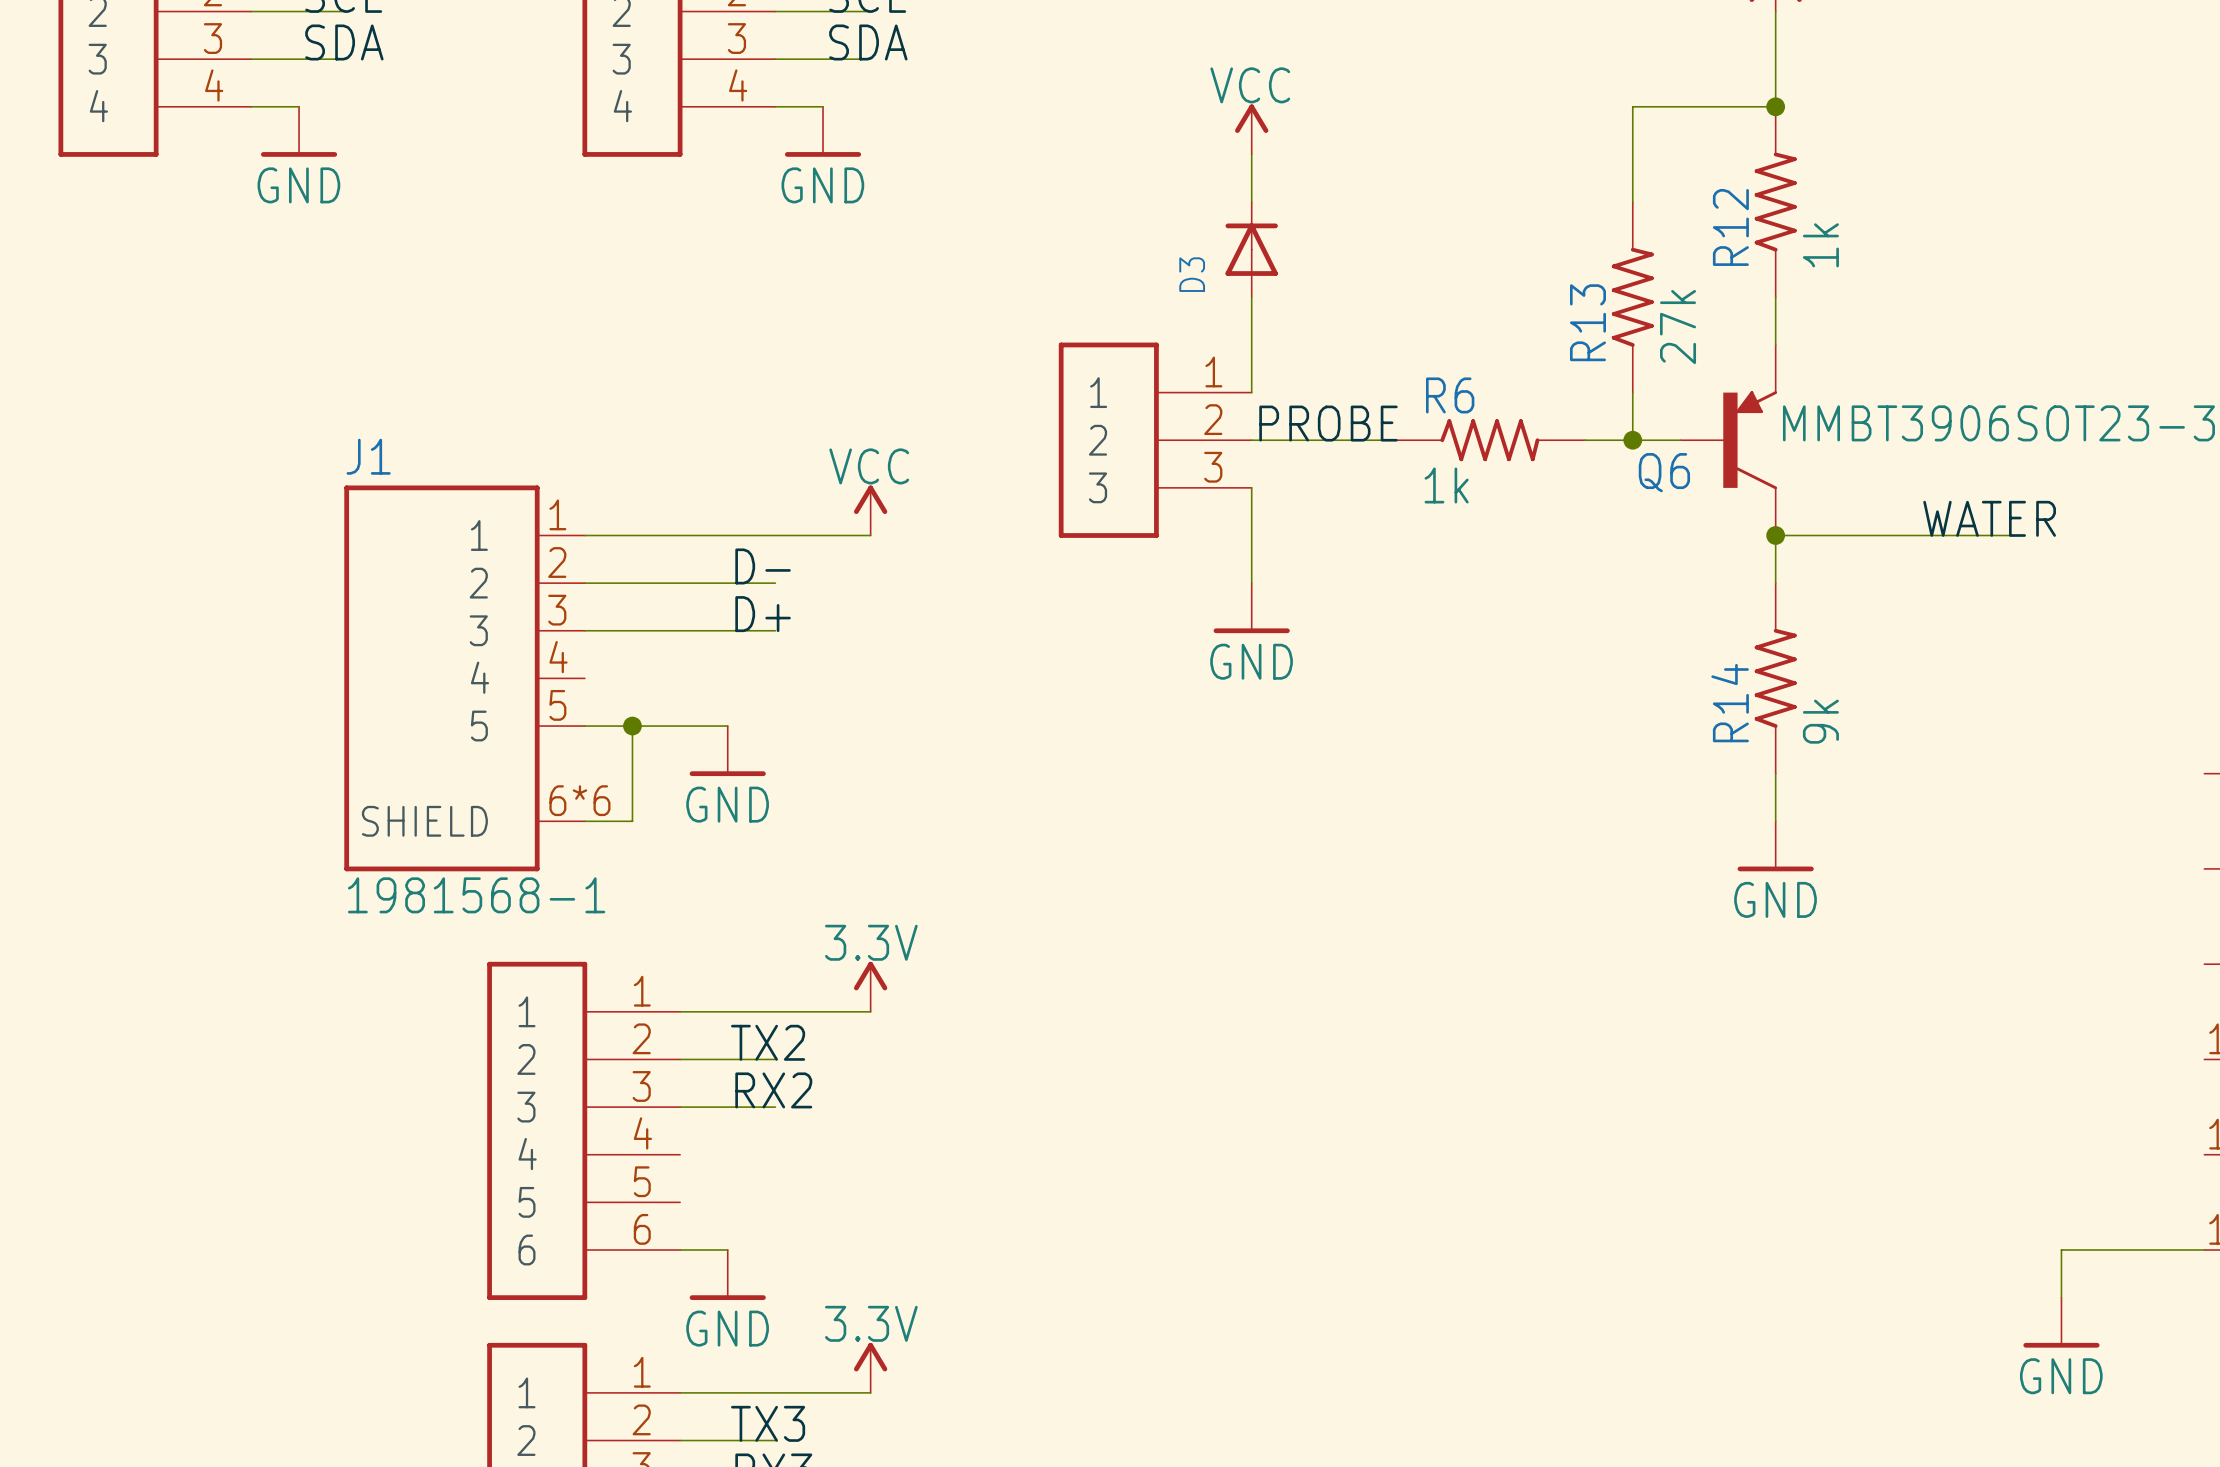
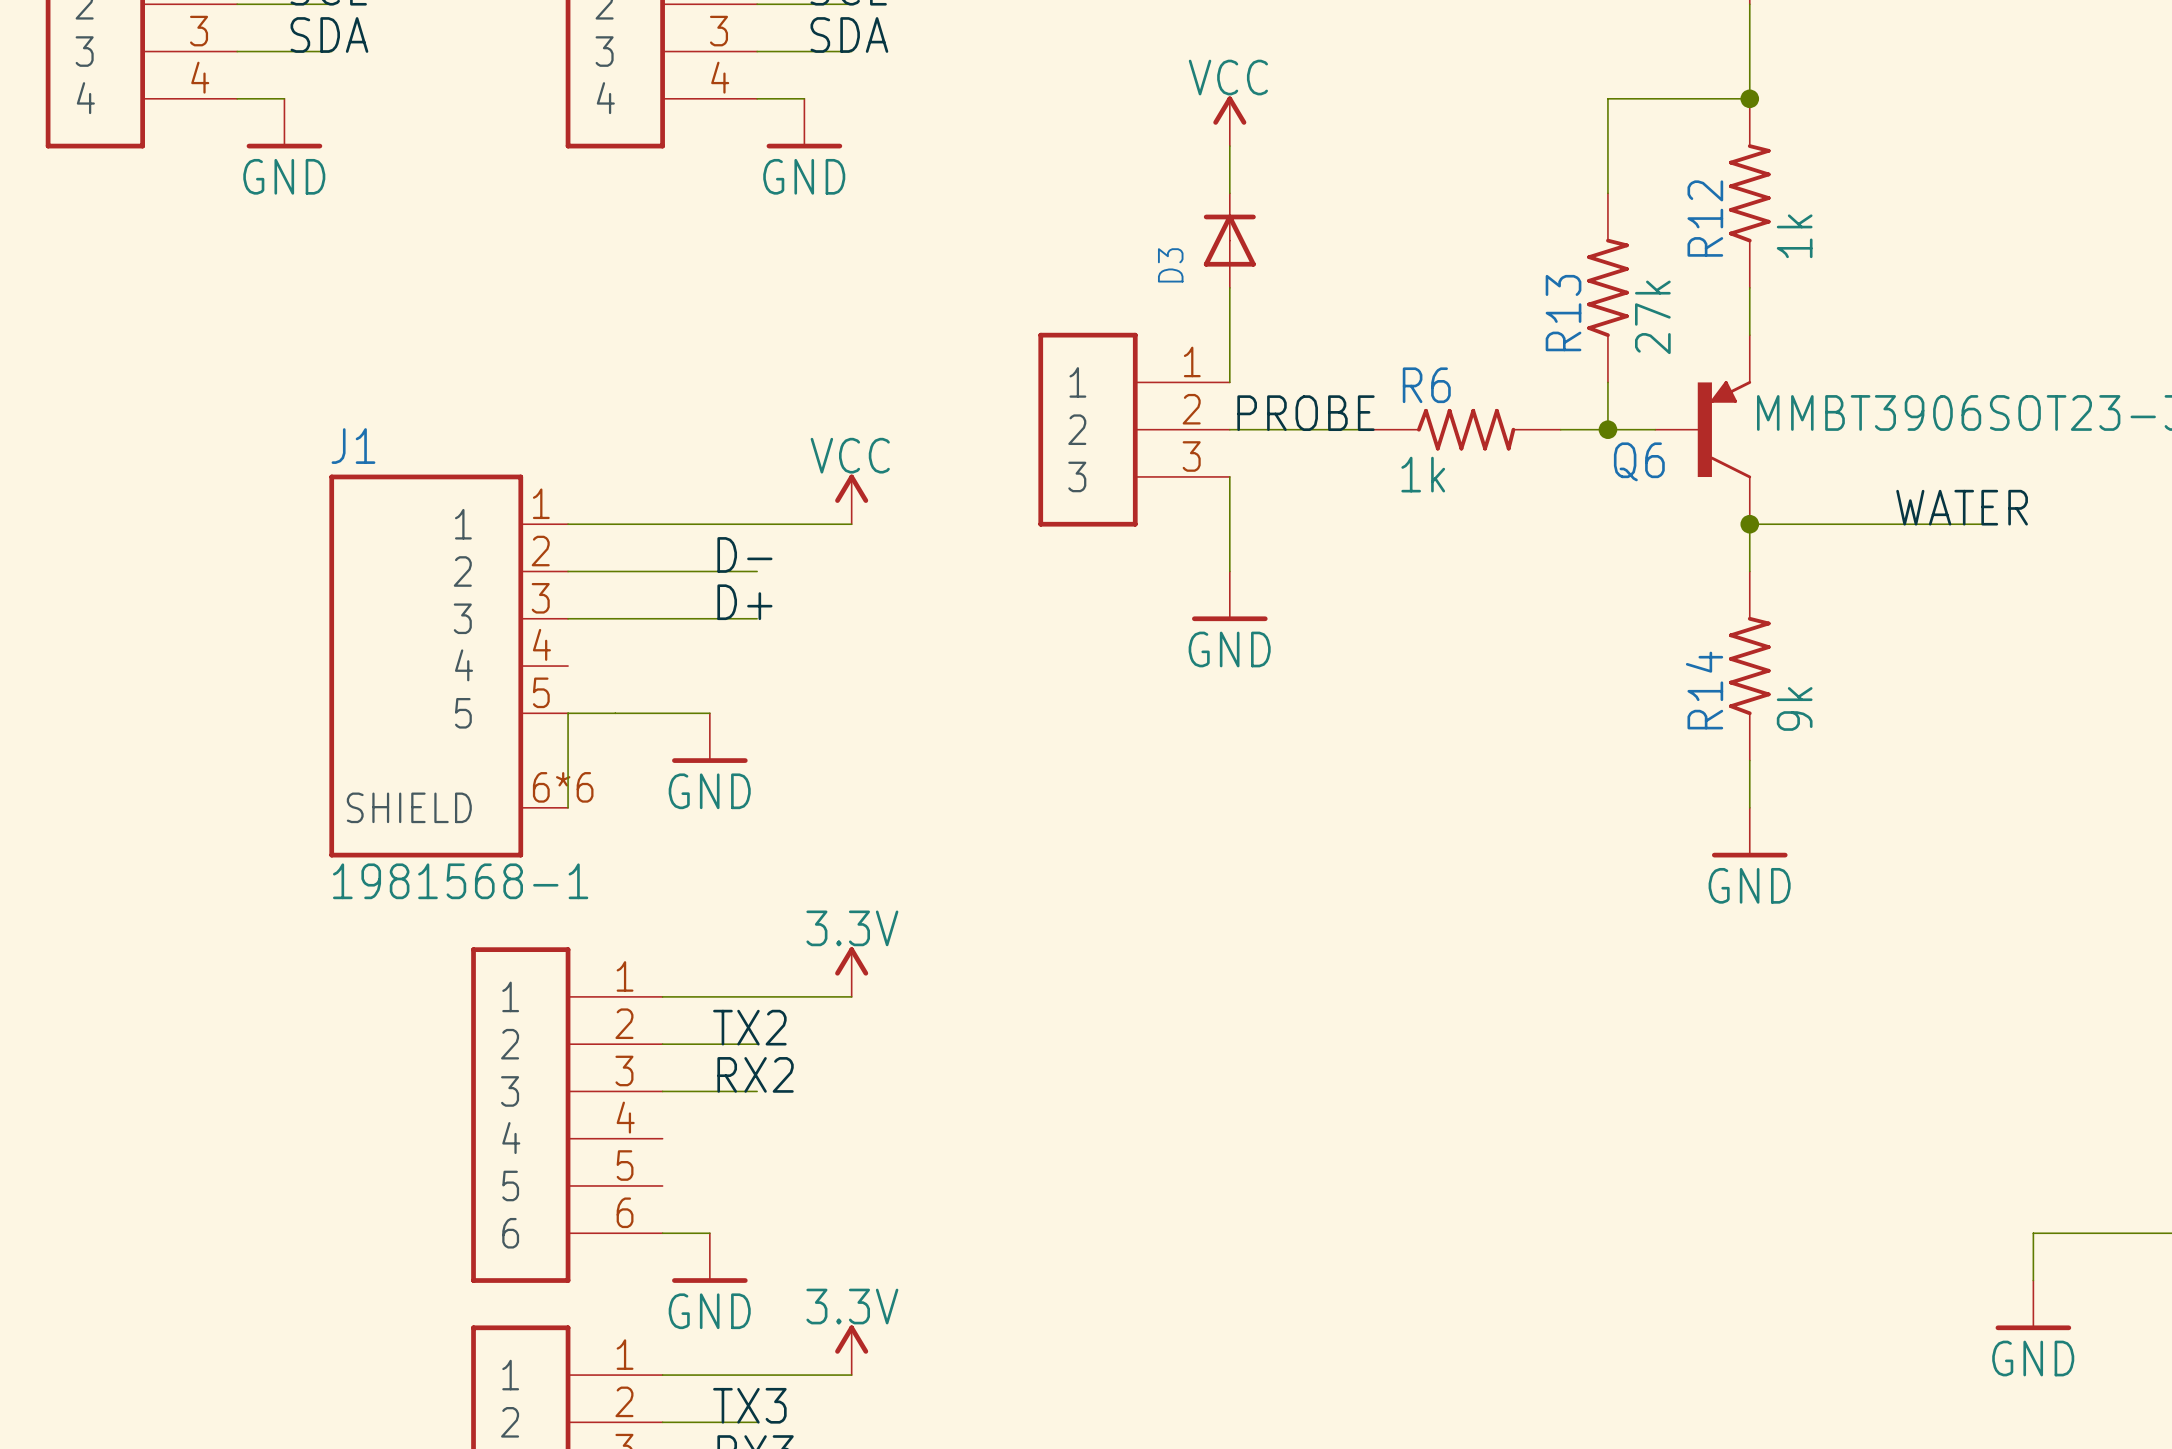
wire: (632, 726) (632, 821) (584, 821) -> (568, 713) (568, 807)
junction: (632, 726) -> none

